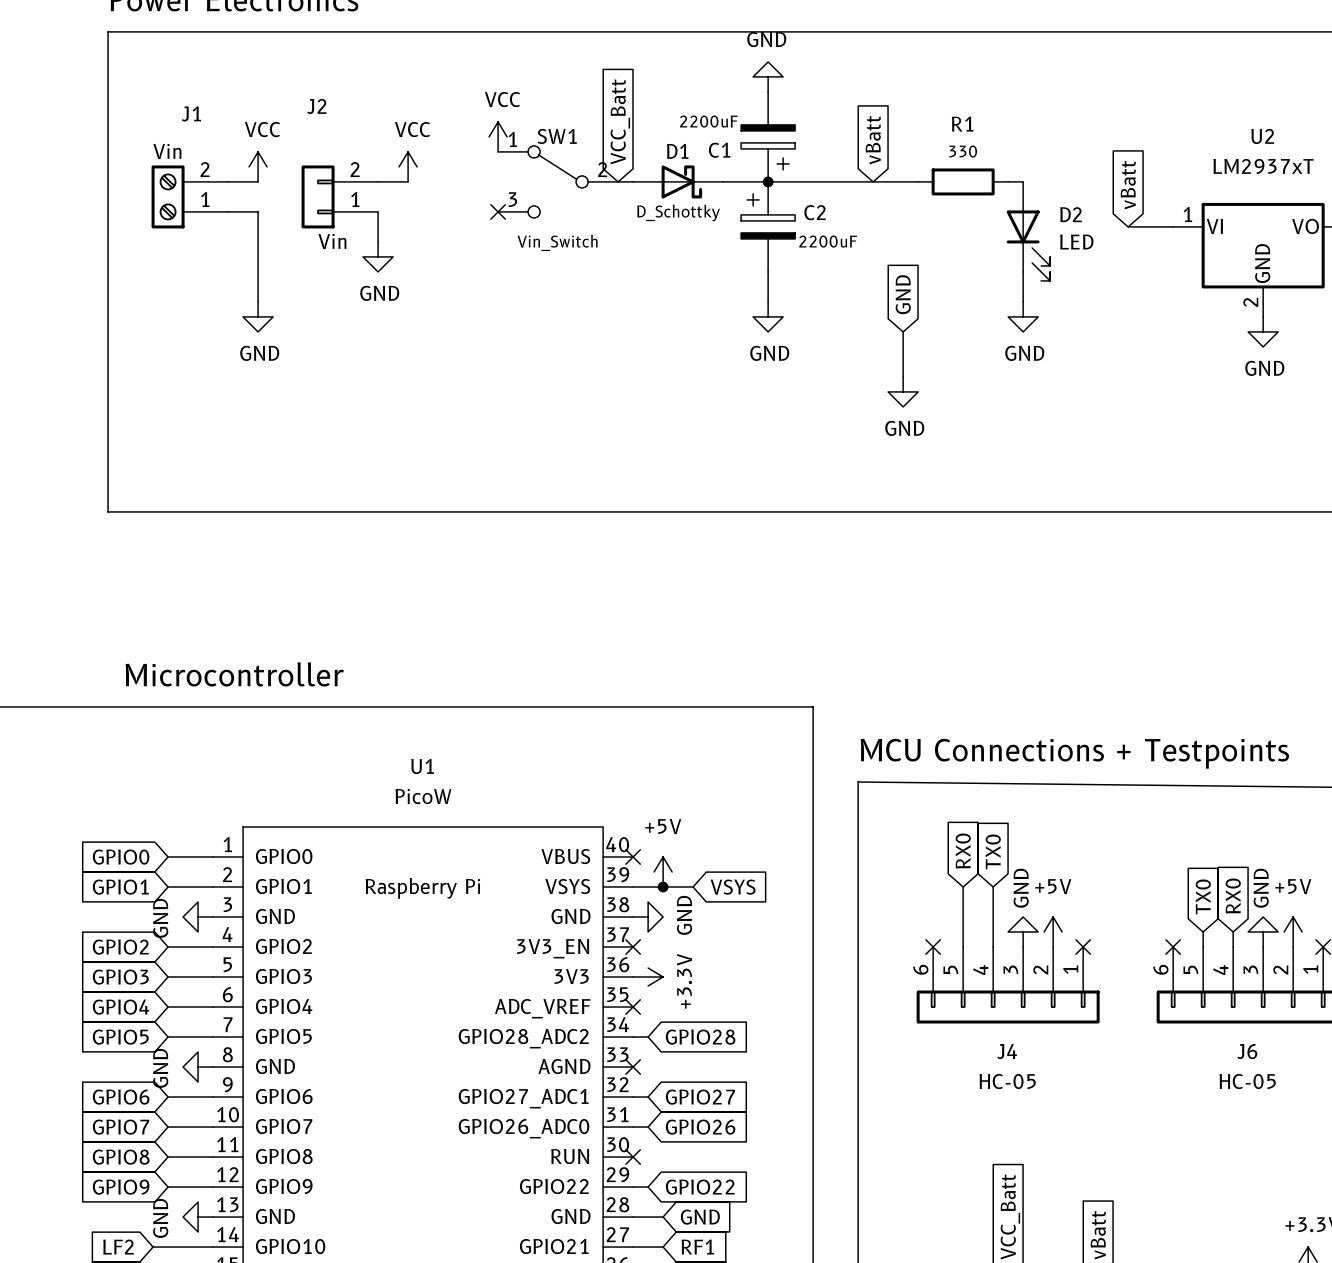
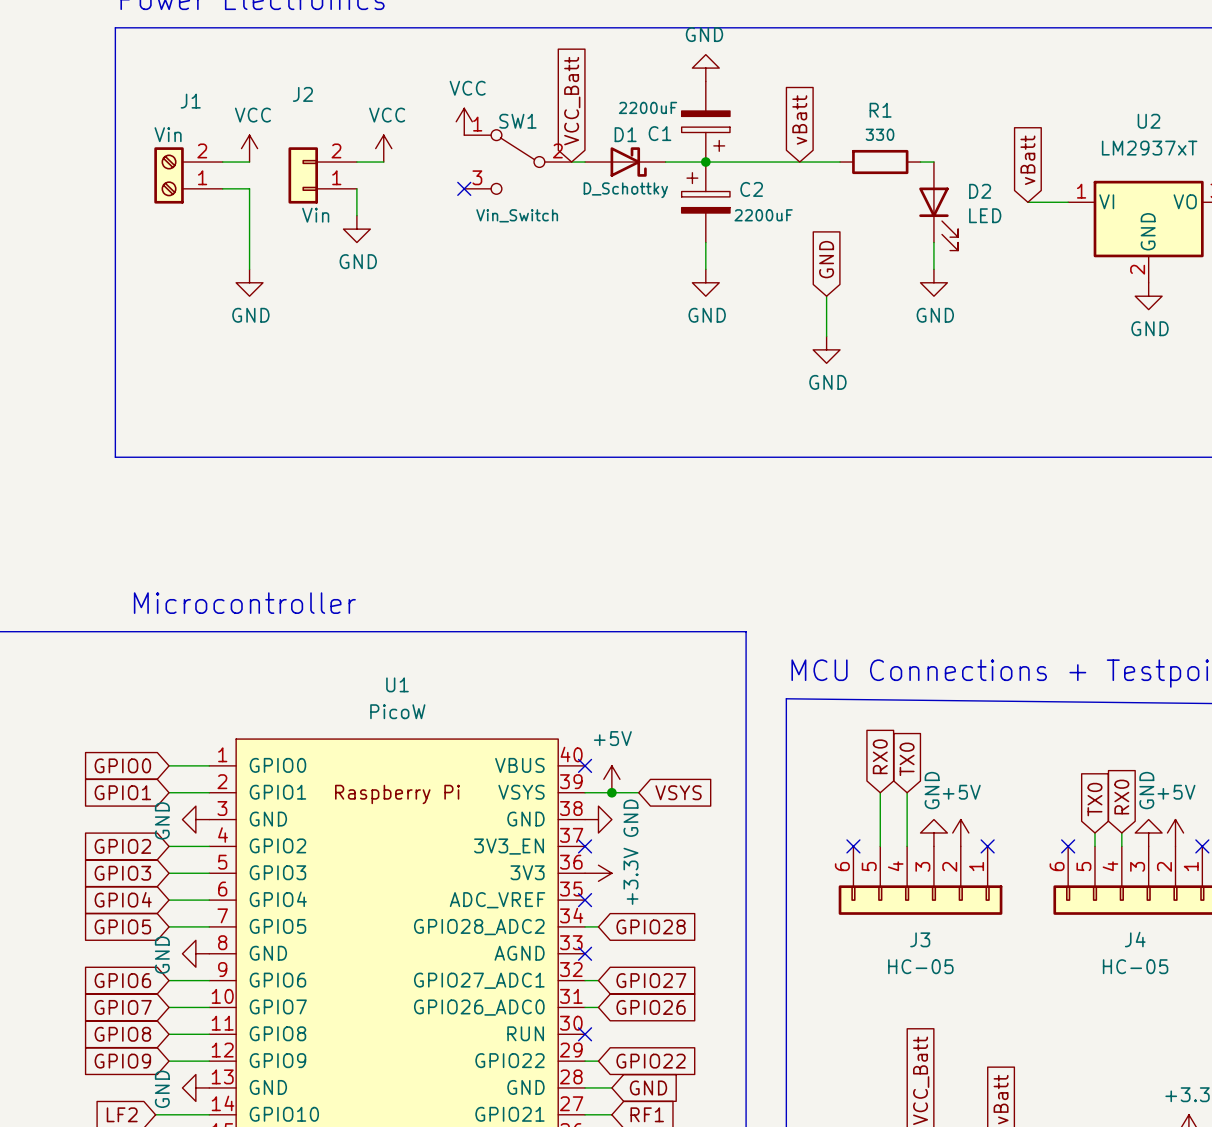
J4 name: J4 (1007, 1051) -> J3 (920, 939)
J6 name: J6 (1247, 1051) -> J4 (1135, 939)

